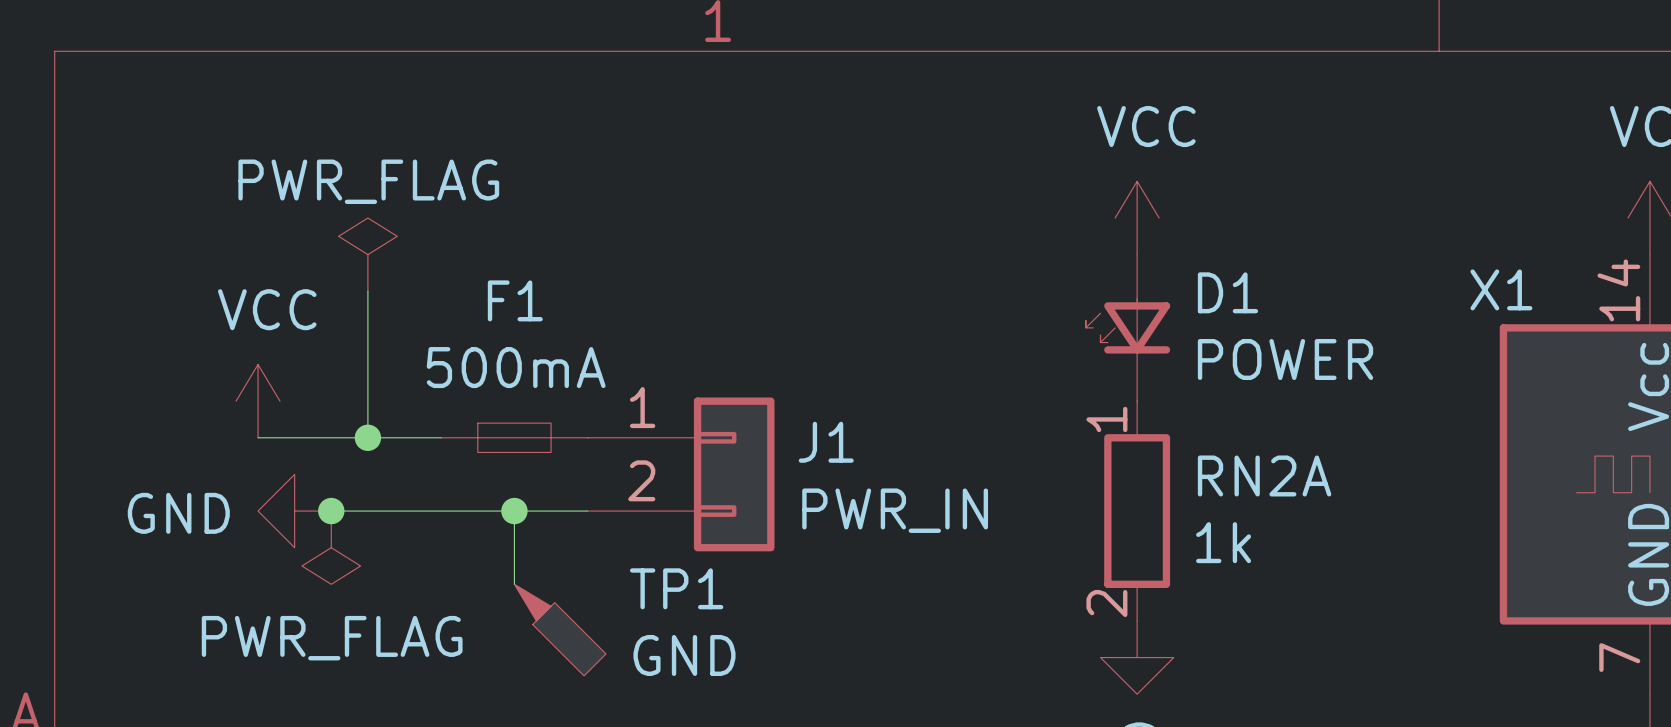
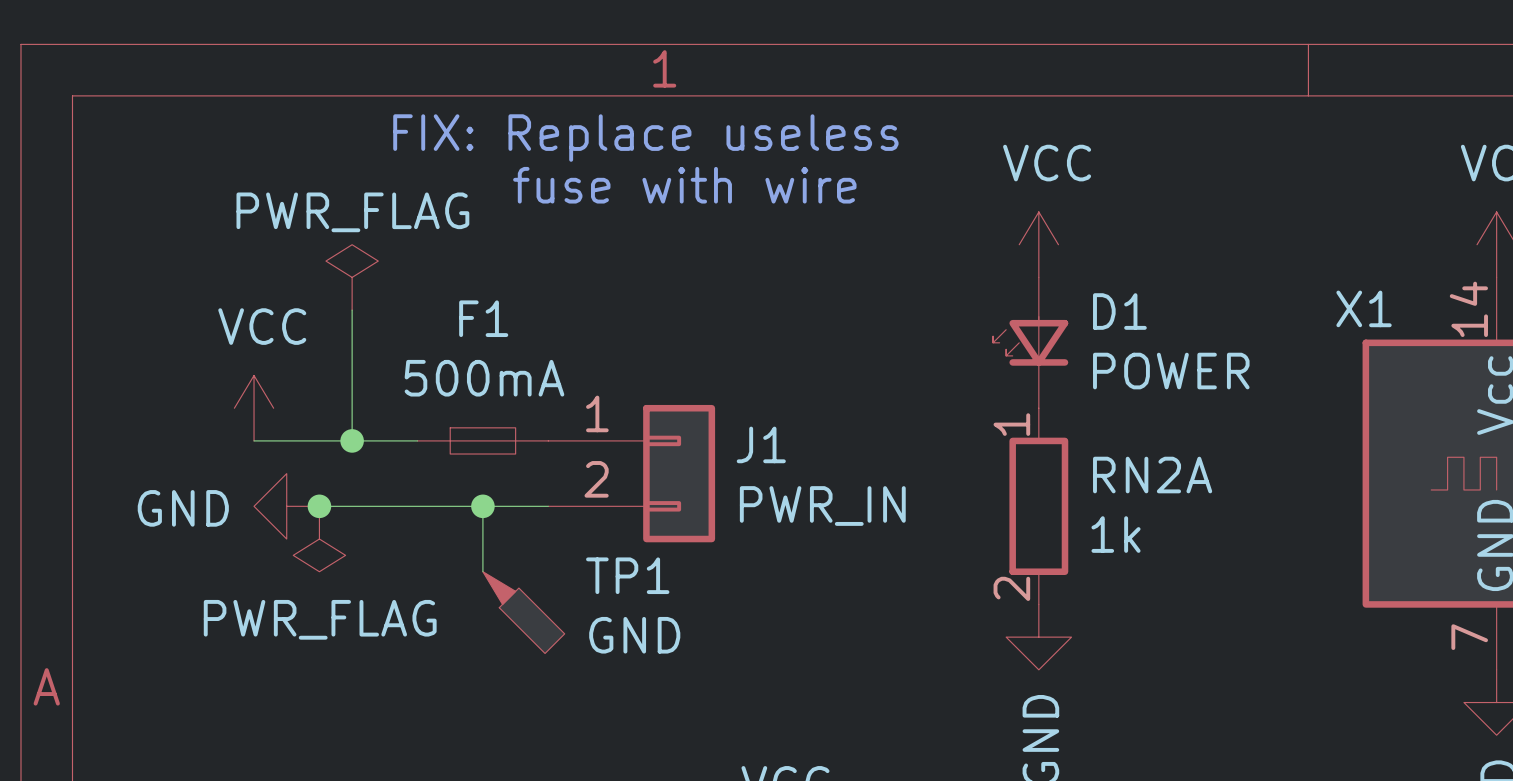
text: none -> FIX: Replace useless (645, 138)
text: none -> fuse with wire (684, 185)

